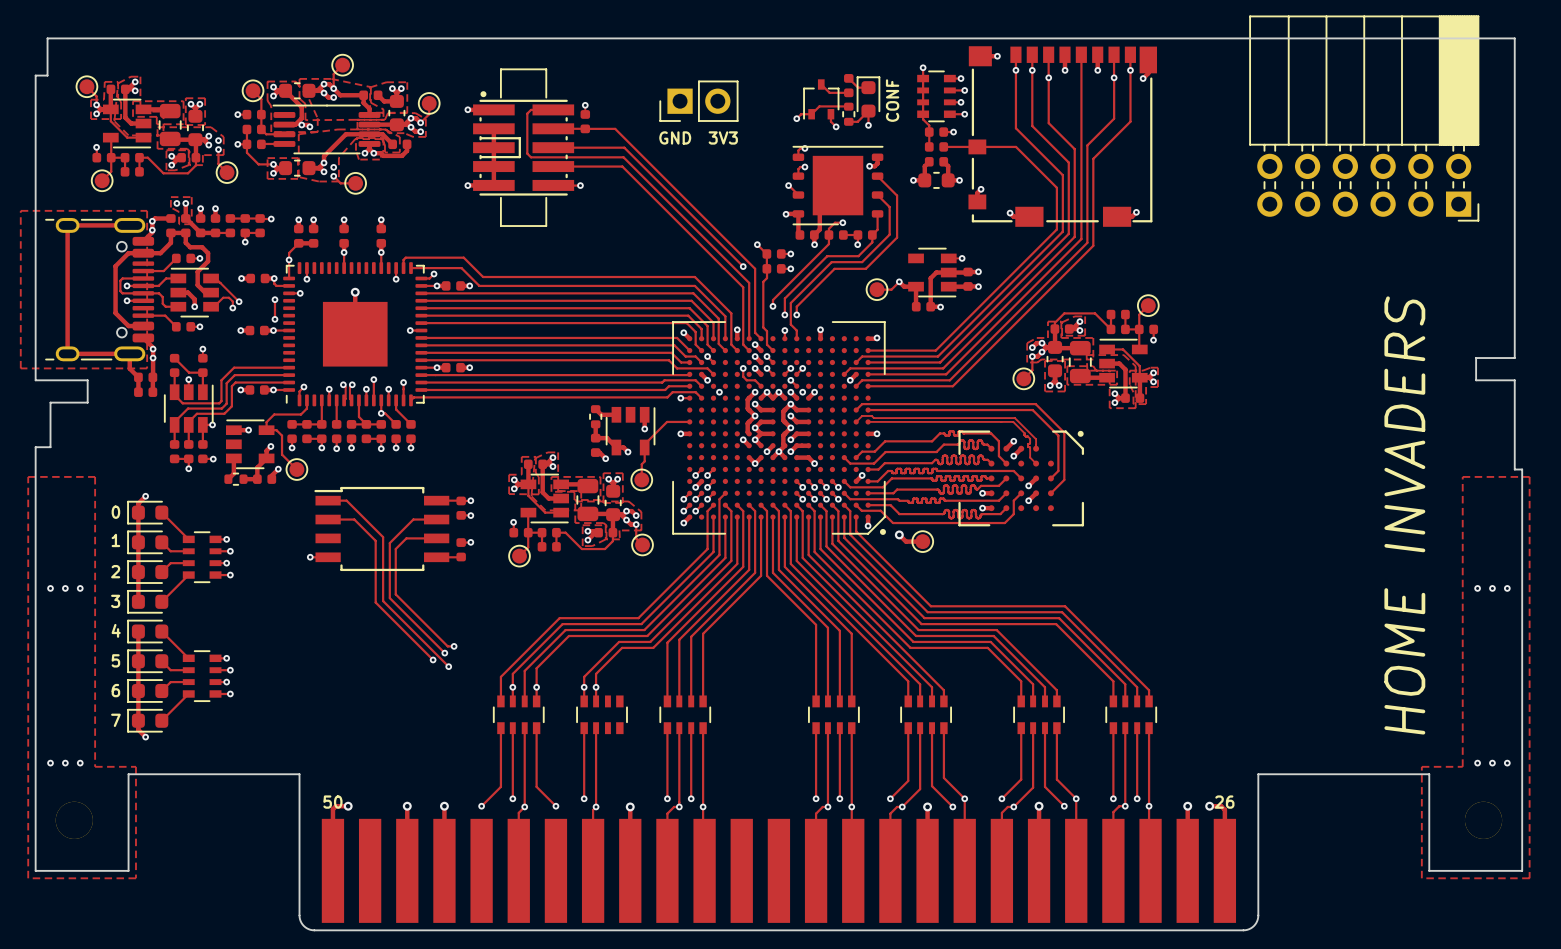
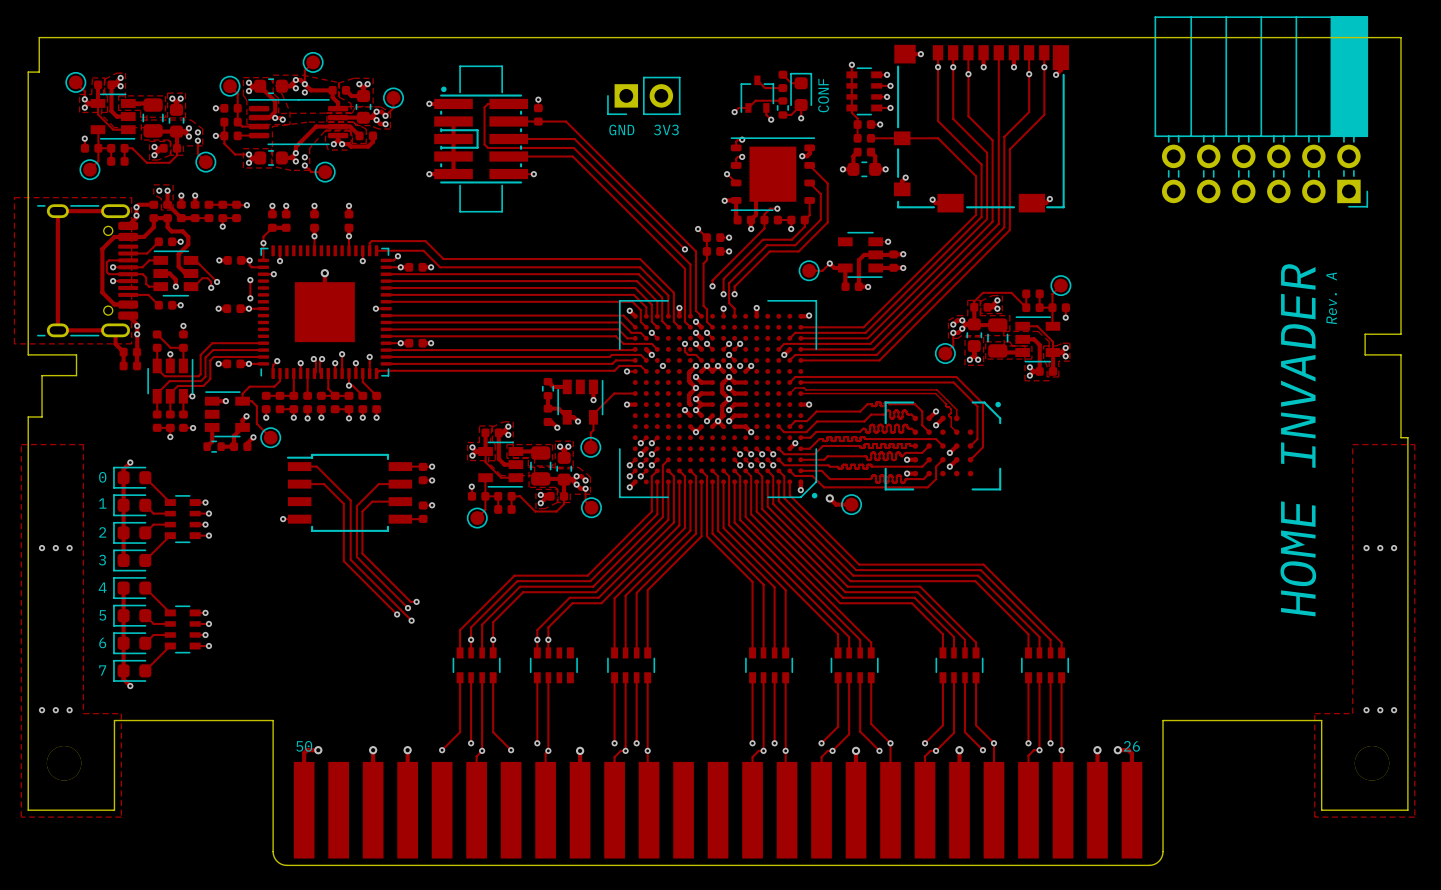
track: (324, 93) (328, 97) (333, 97) -> none
text: none -> Rev. A (1331, 298)
text: HOME INVADERS (1404, 515) -> HOME INVADER (1298, 440)

